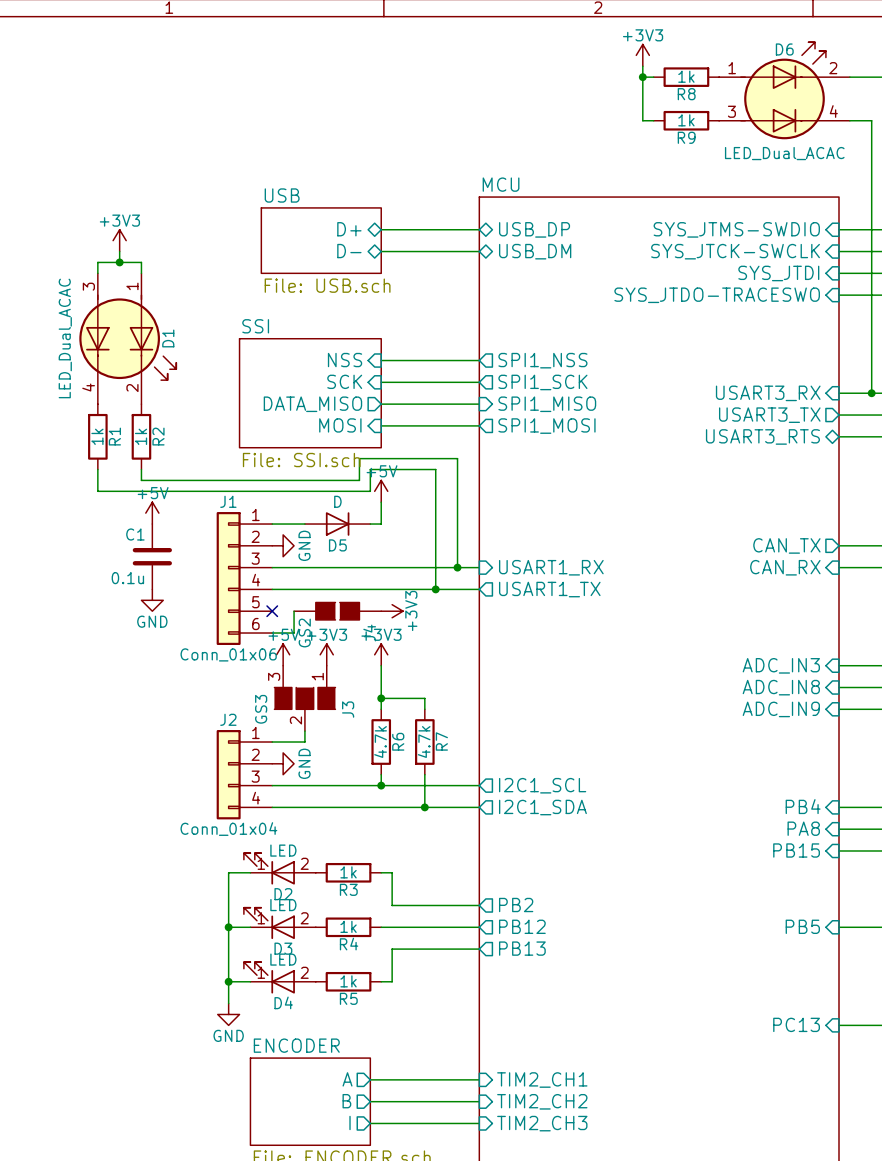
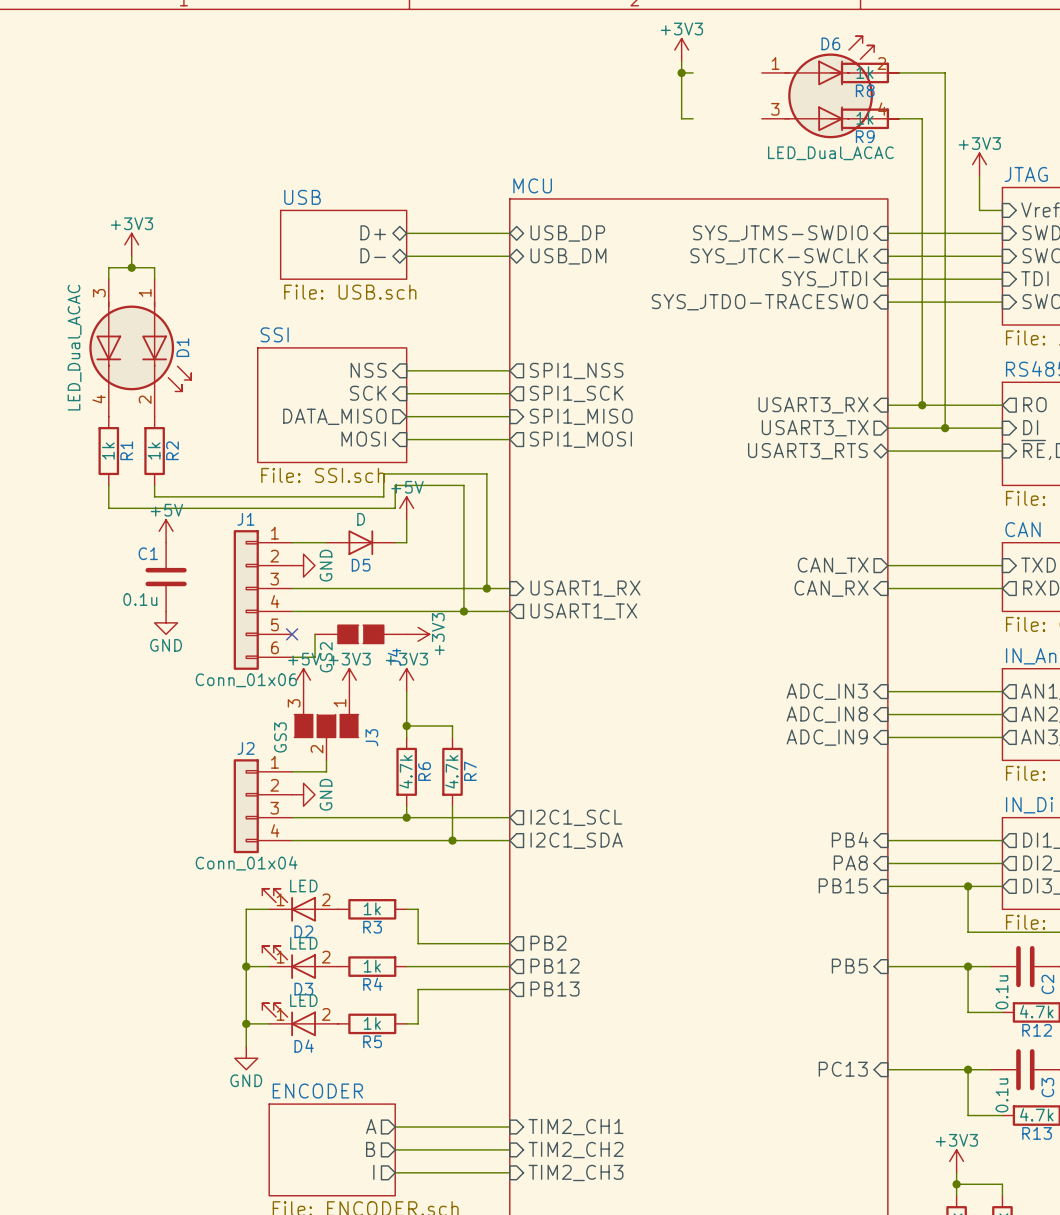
R8 position: (686, 77) -> (864, 72)
R9 position: (686, 120) -> (864, 118)

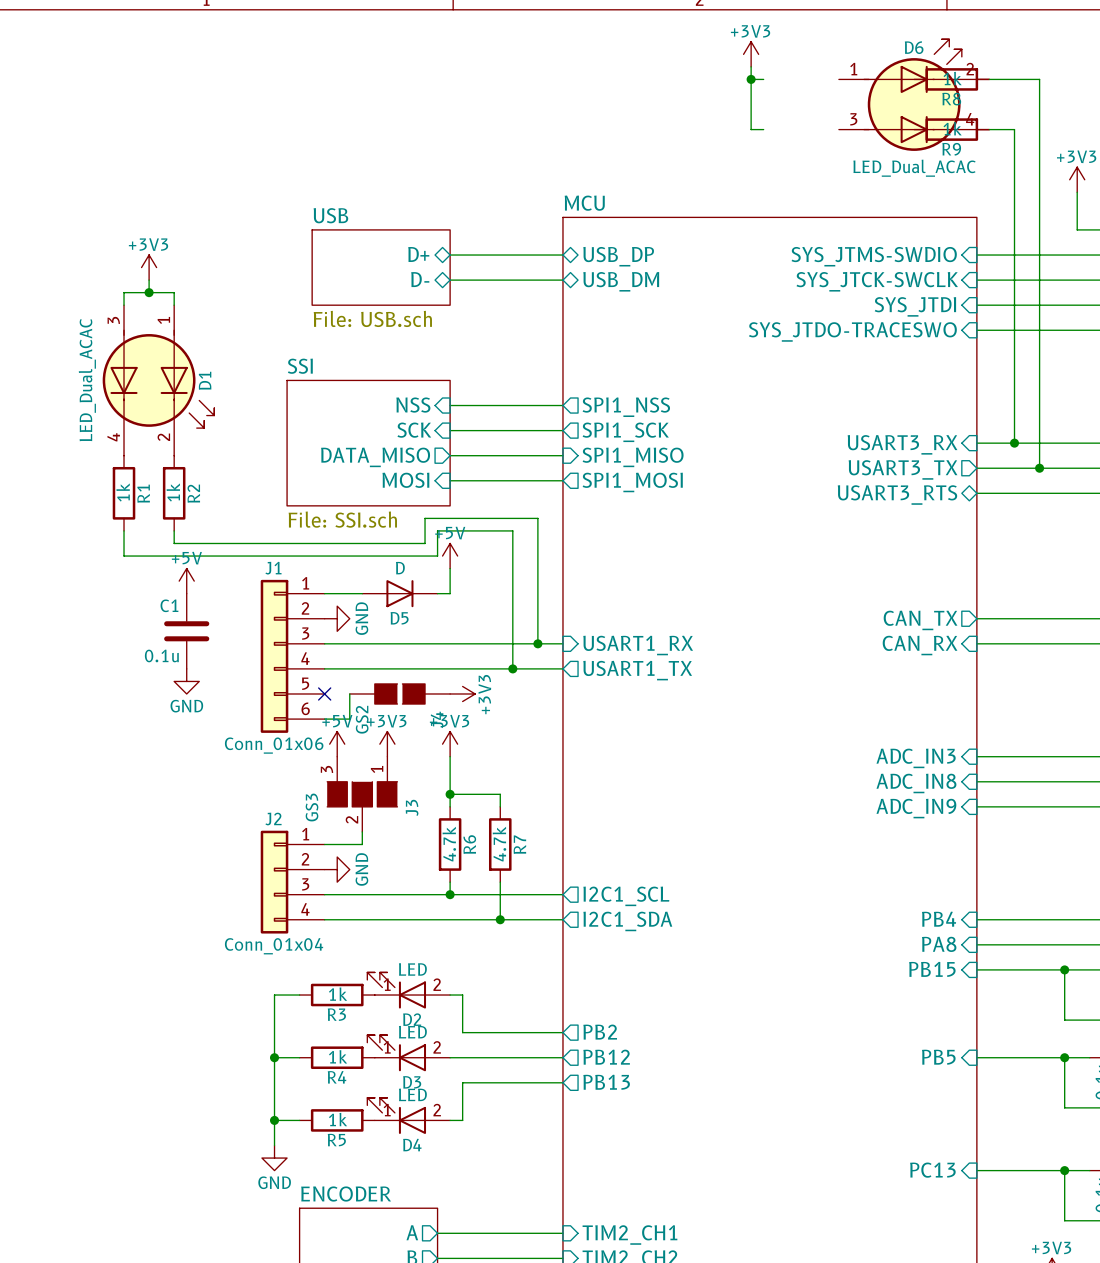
D2 position: (300, 905) -> (408, 990)
R3 position: (372, 909) -> (337, 995)
D3 position: (300, 962) -> (408, 1053)
R4 position: (372, 966) -> (337, 1057)
D4 position: (300, 1019) -> (408, 1115)
R5 position: (372, 1023) -> (337, 1120)

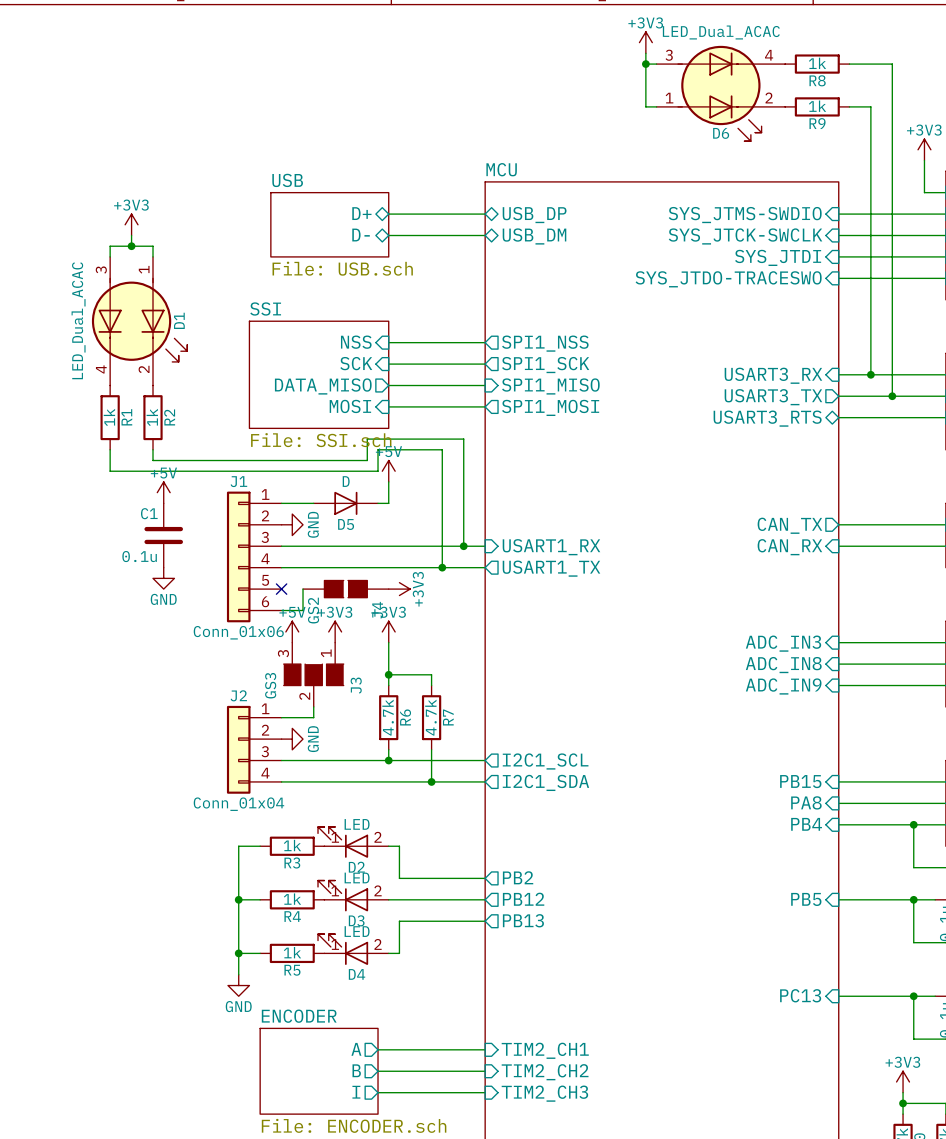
D6 flip: as is (912, 95) -> up-down (719, 93)
sheet pin: PB4 (939, 919) -> PB15 (800, 781)
sheet pin: PB15 (932, 969) -> PB4 (806, 824)

